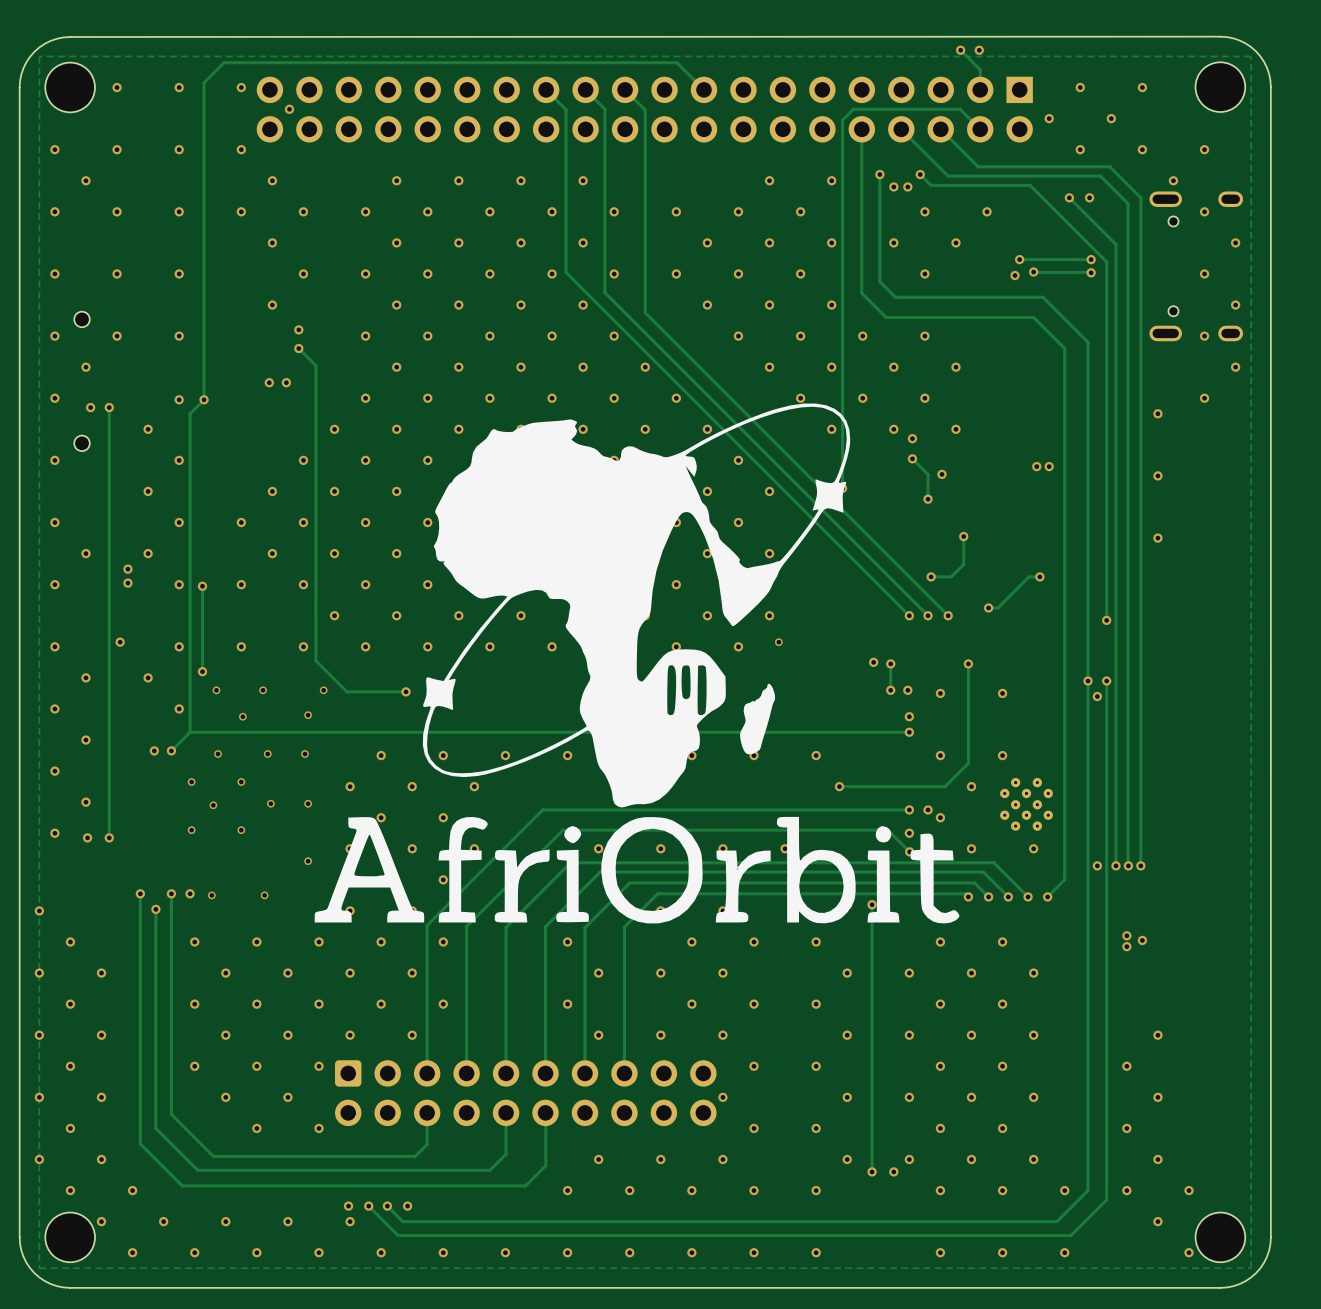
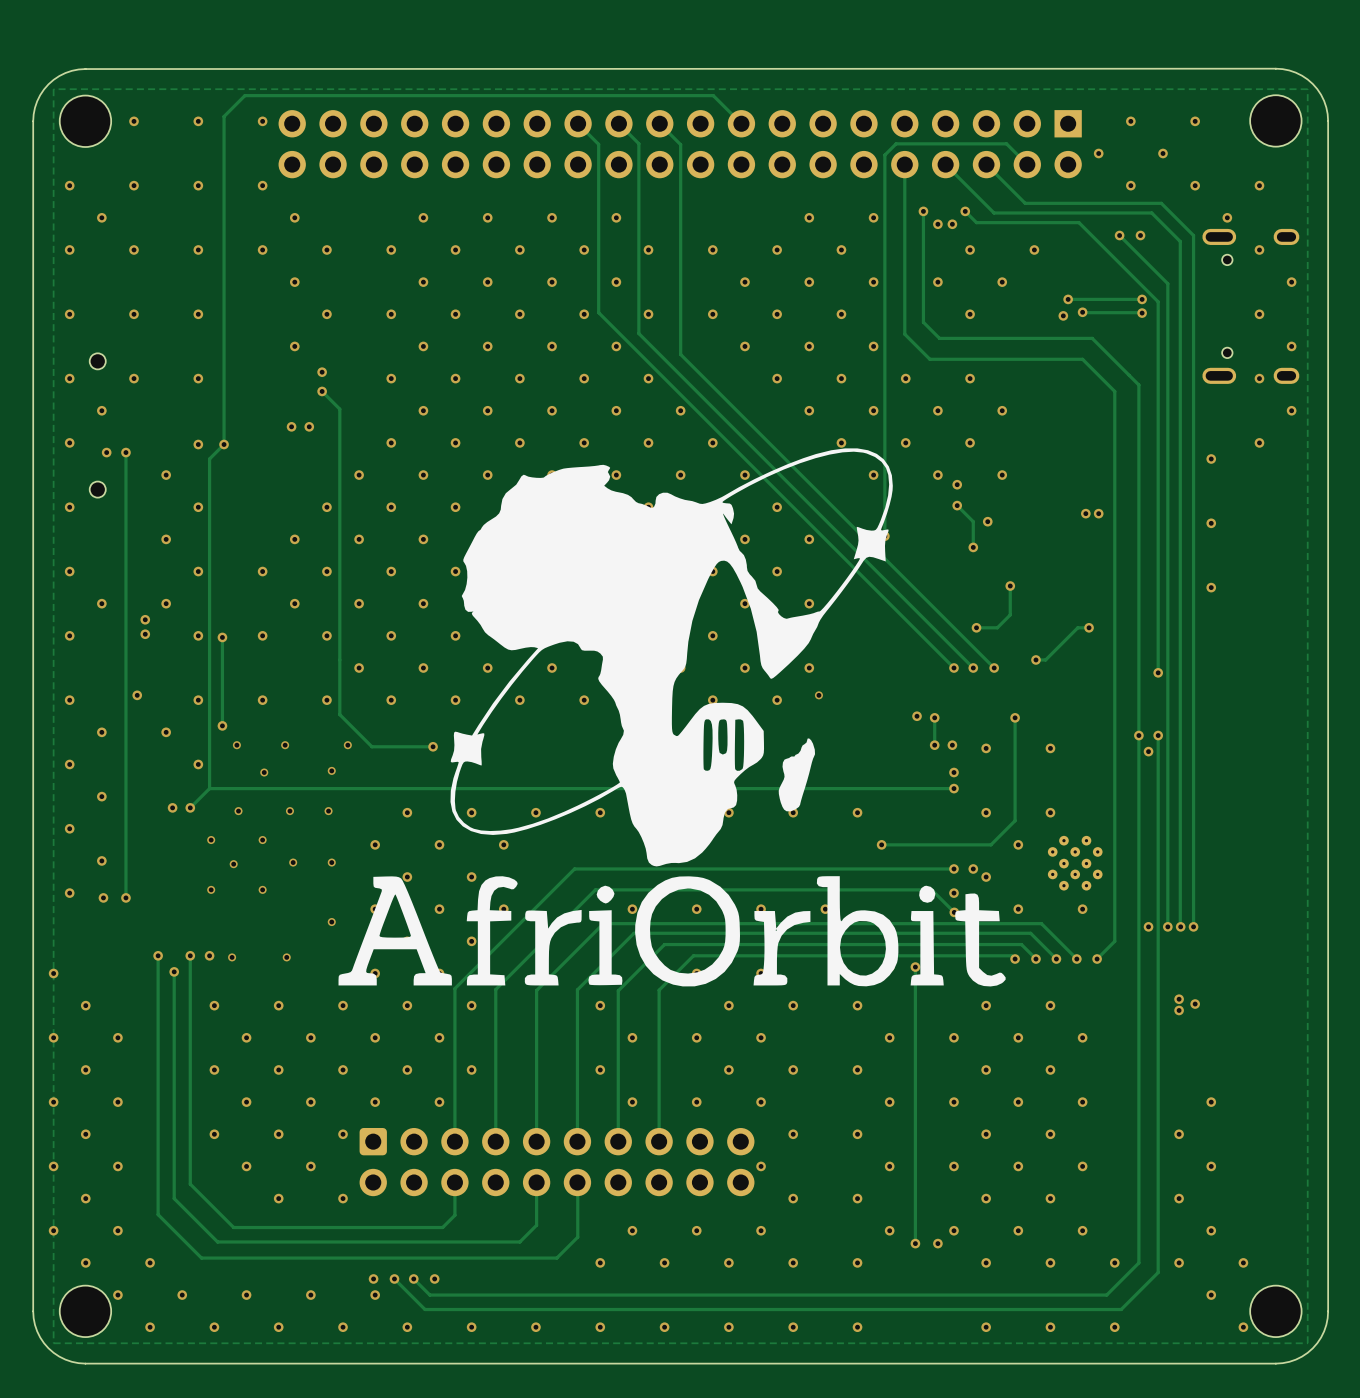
track: (960, 50) (980, 69) (980, 89) -> none
via: (960, 50) -> none
via: (979, 50) -> none
via: (289, 109) -> none

